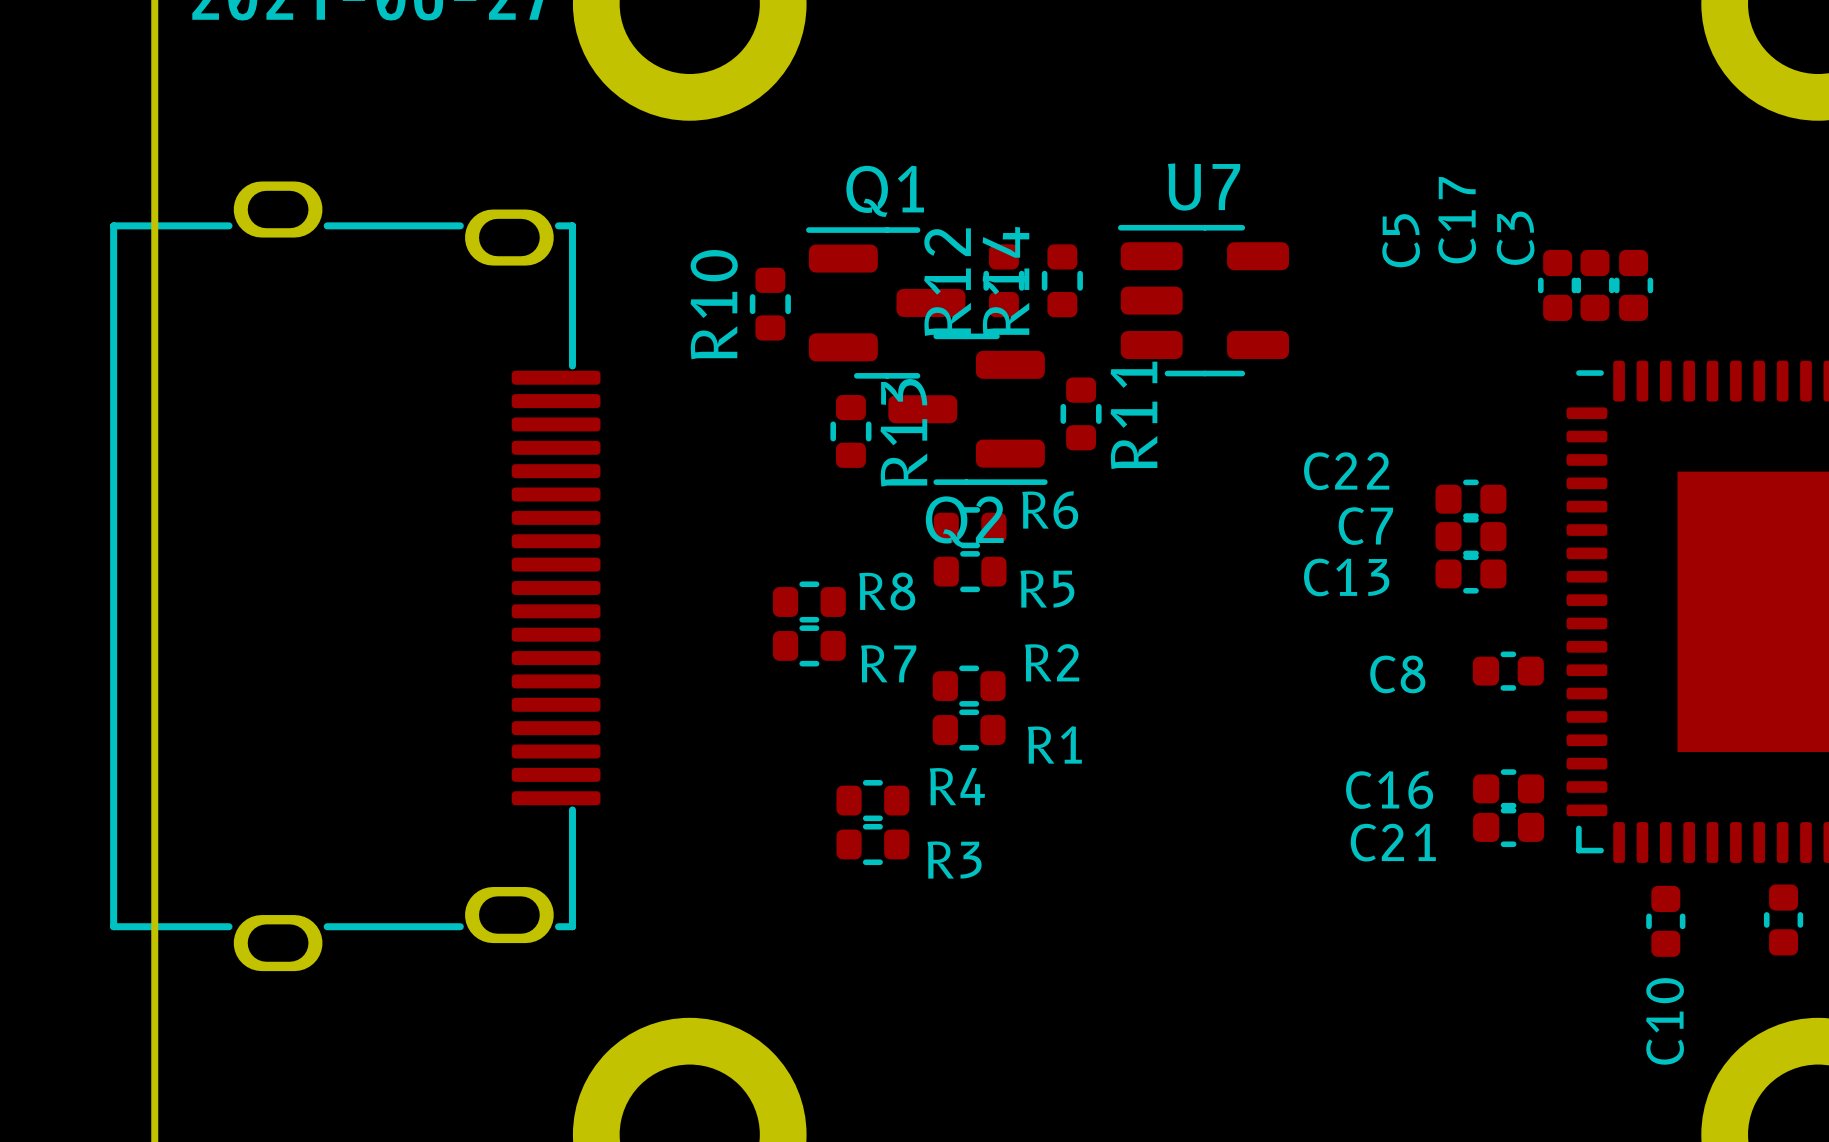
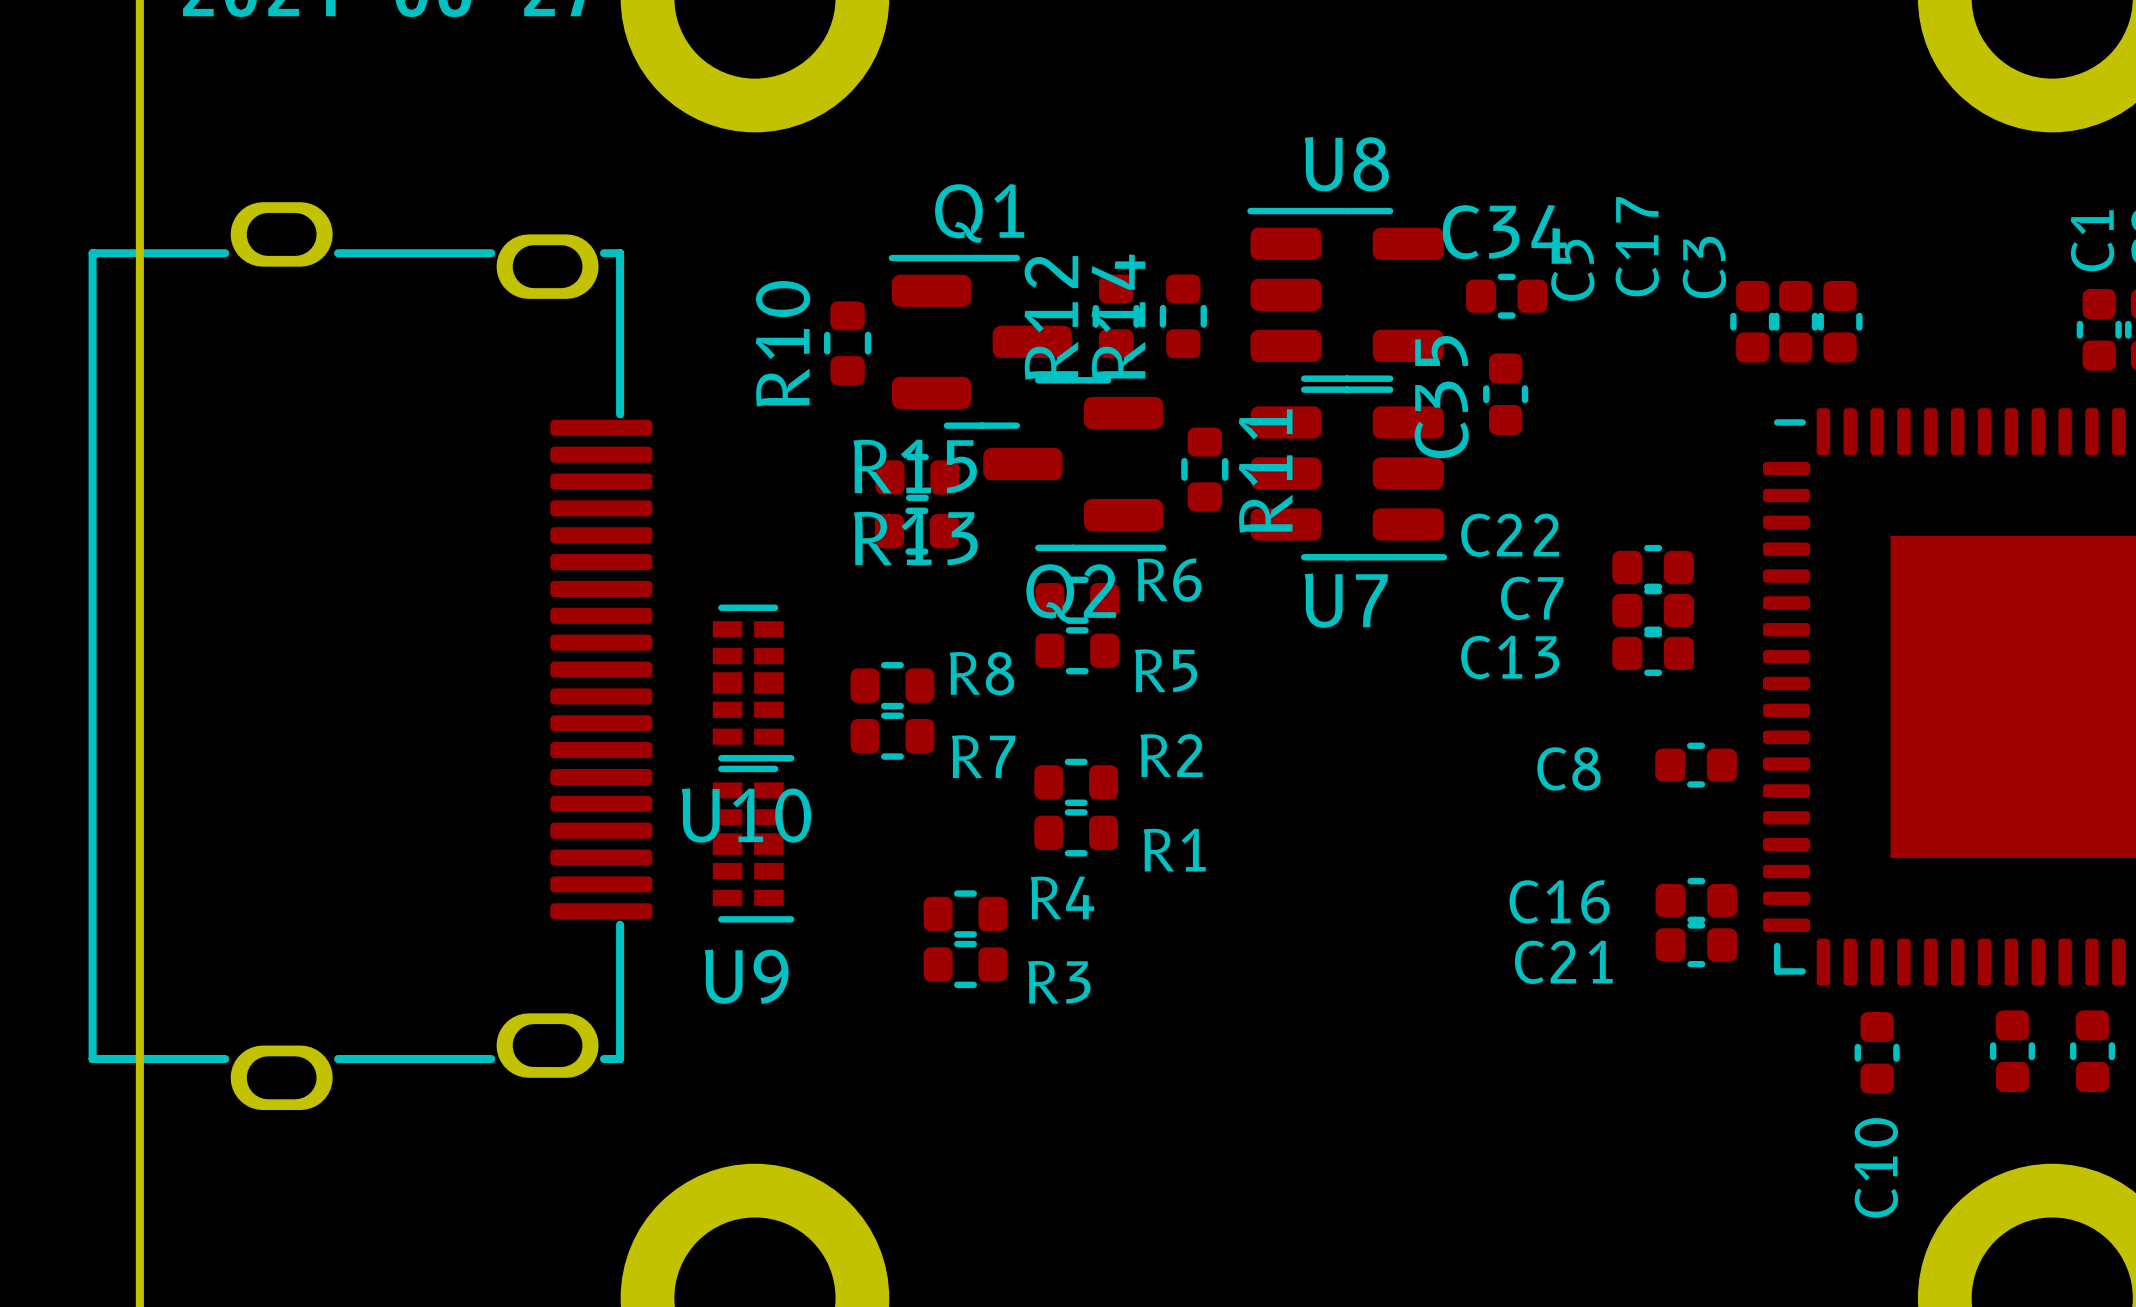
U7 name position: U7 (1204, 186) -> U7 (1346, 600)
U7 footprint: [1117, 224, 1289, 377] -> [1250, 386, 1448, 561]
U8: none -> (1345, 294)
C34: none -> (1506, 296)
C35: none -> (1505, 394)
R13 rotation: 0° (850, 431) -> 90° clockwise (917, 477)
R15: none -> (916, 531)
U10: none -> (753, 682)
U9: none -> (753, 844)

